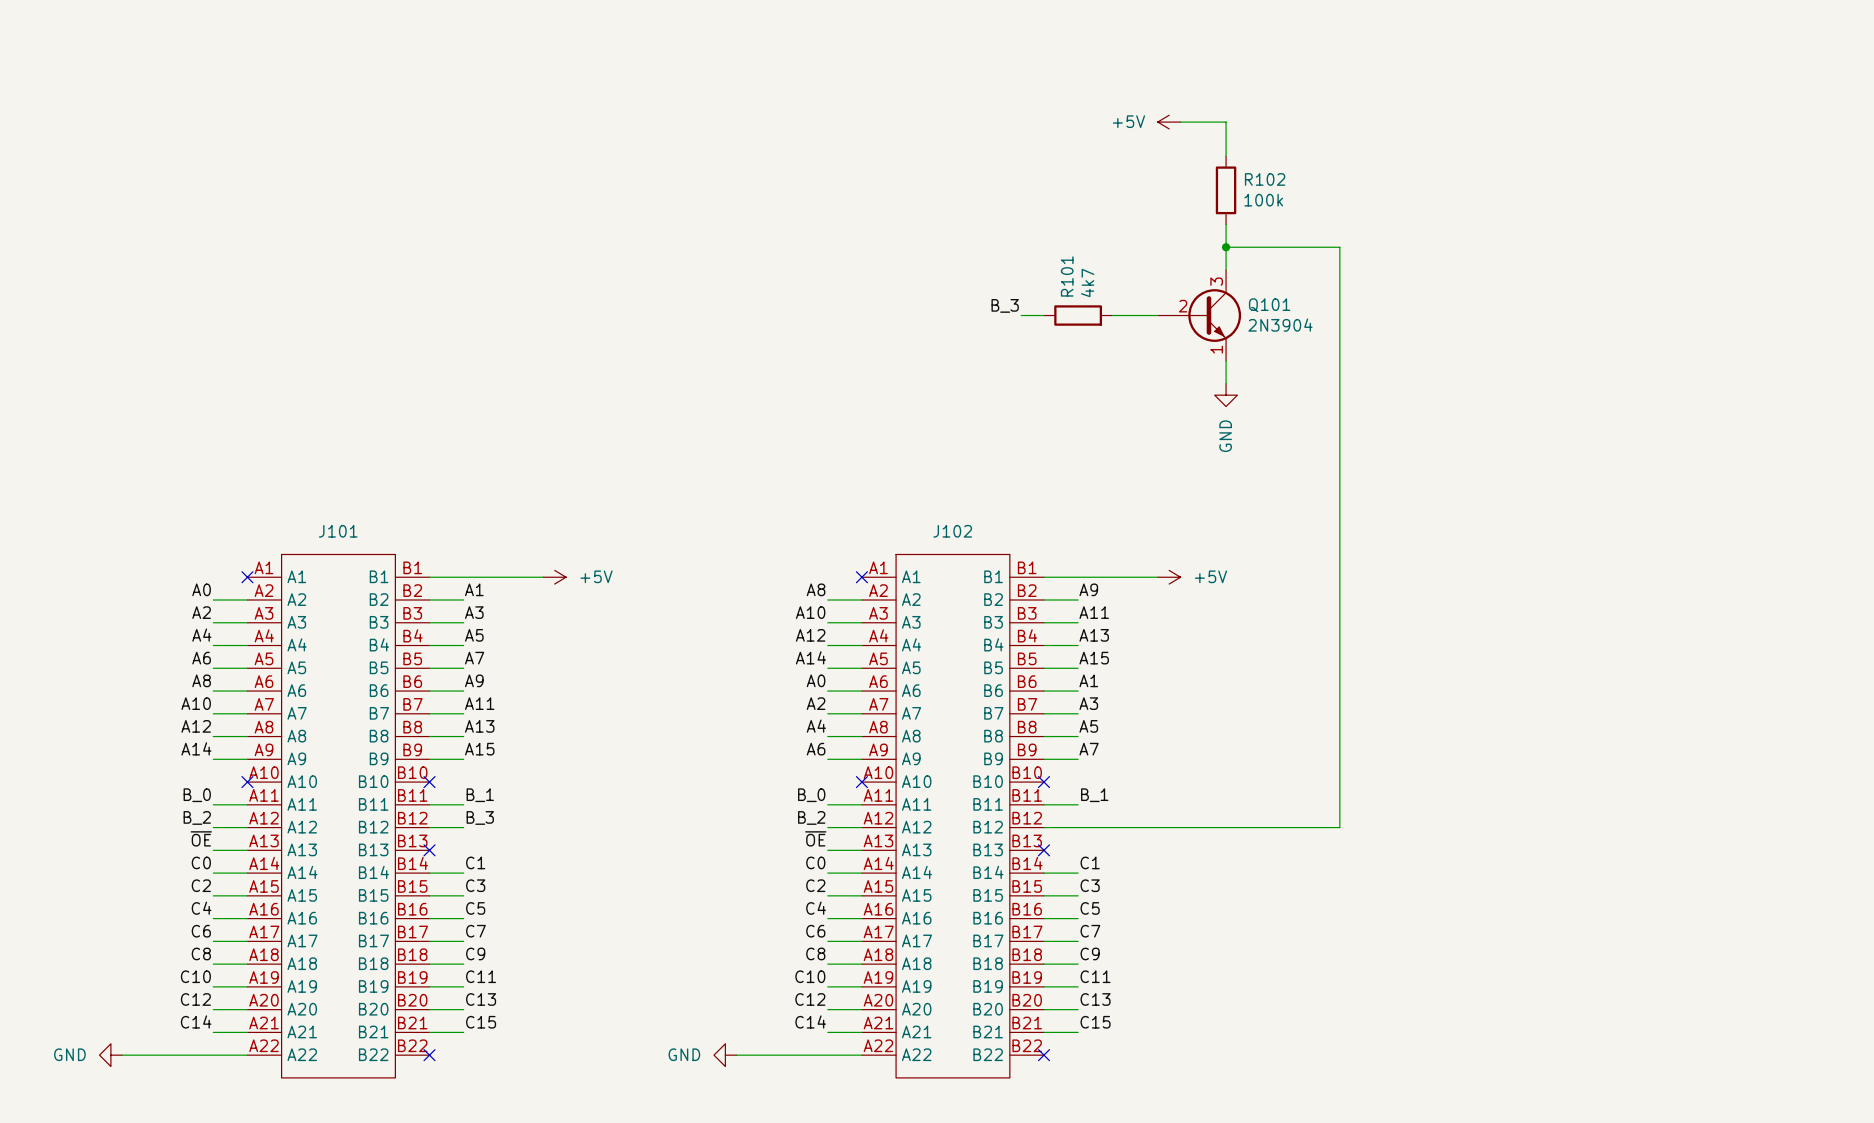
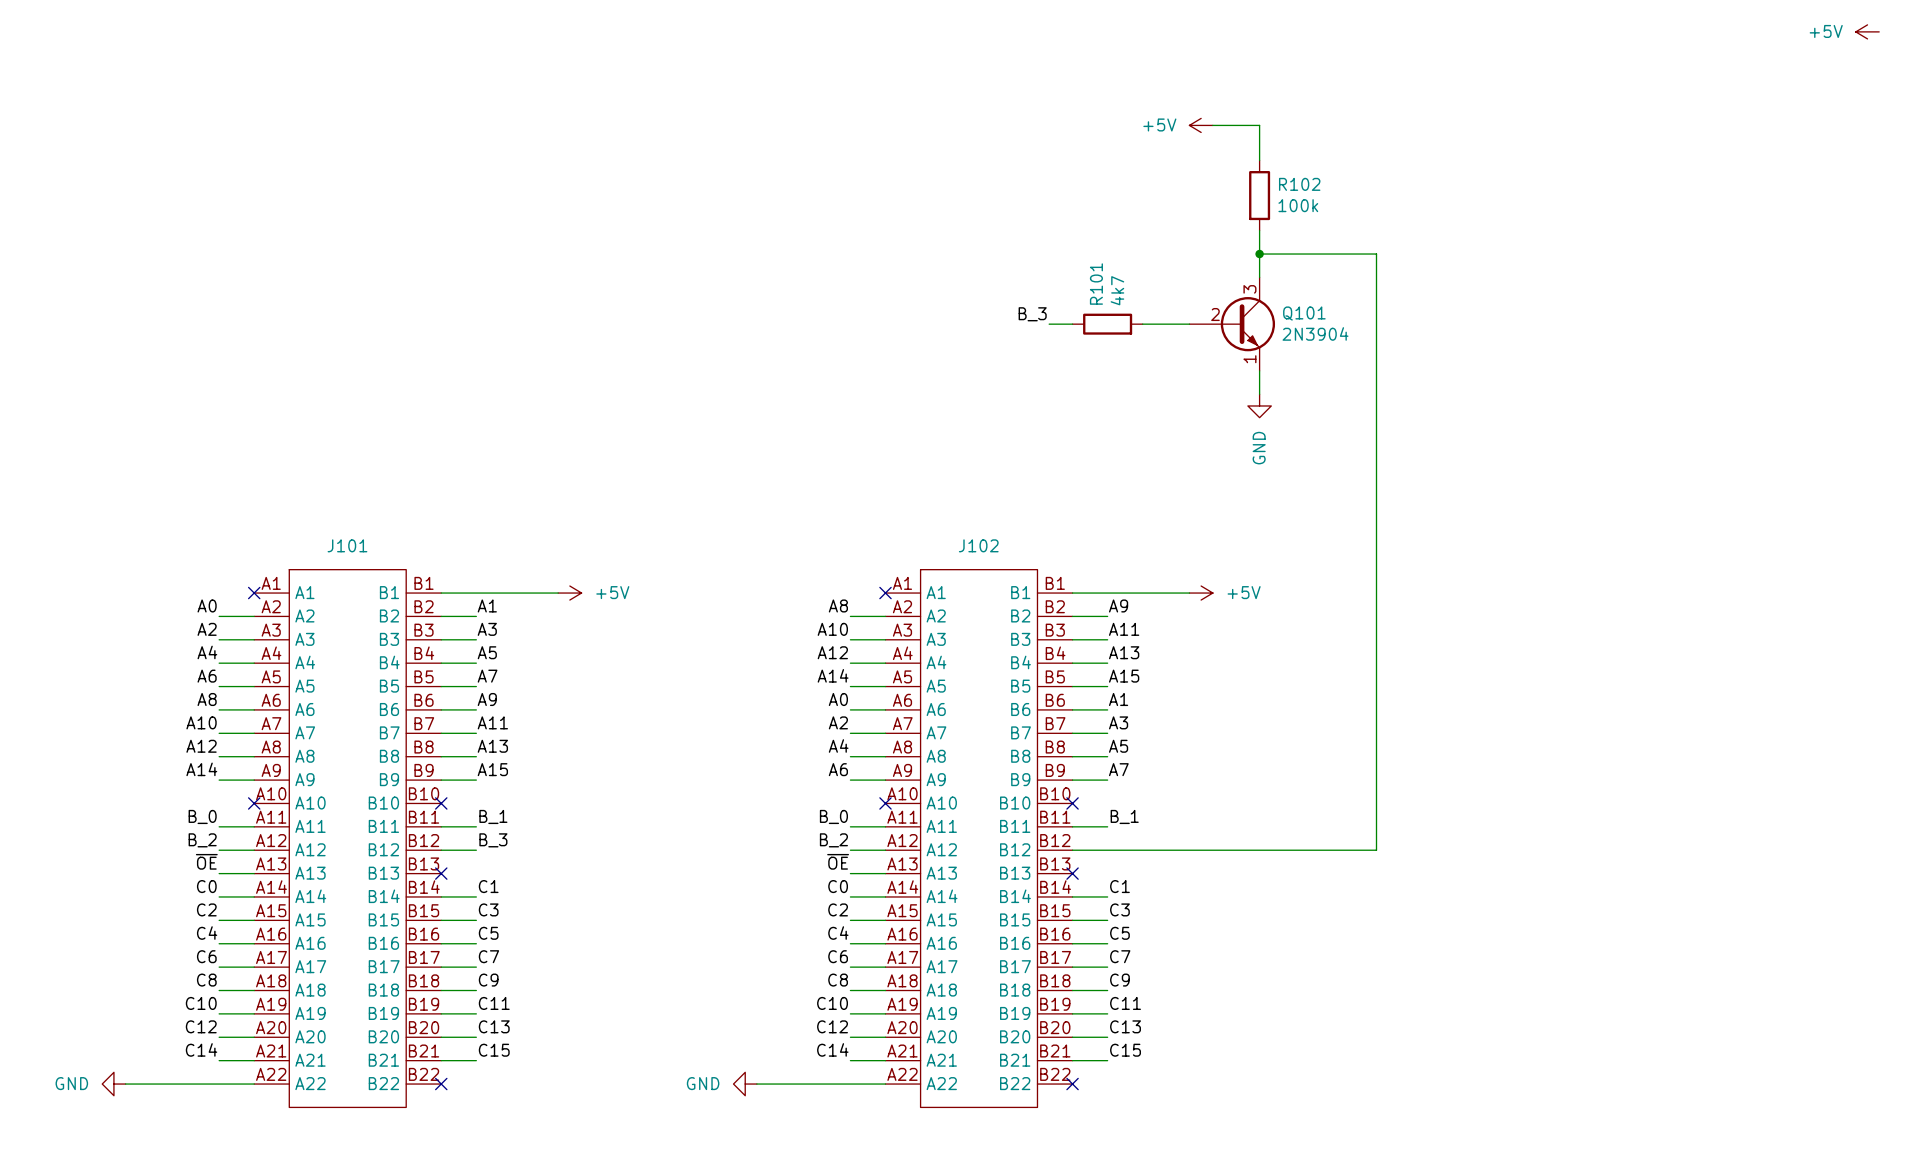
power symbol: none -> +5V (1867, 31)

